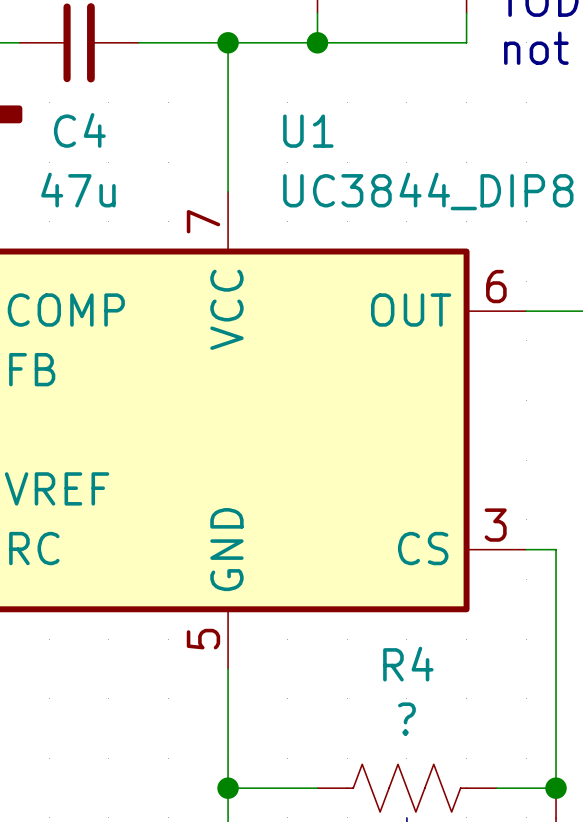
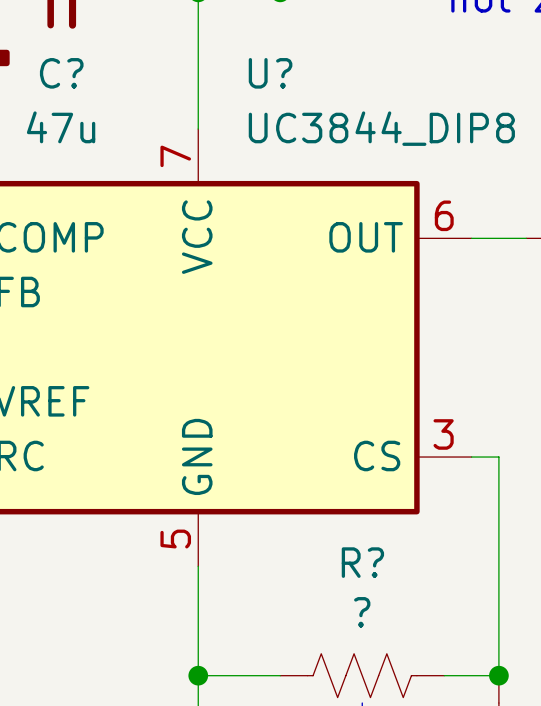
C4 name: C4 (79, 130) -> C? (61, 73)
U1 name: U1 (308, 131) -> U? (270, 73)
R4 name: R4 (408, 664) -> R? (362, 562)

